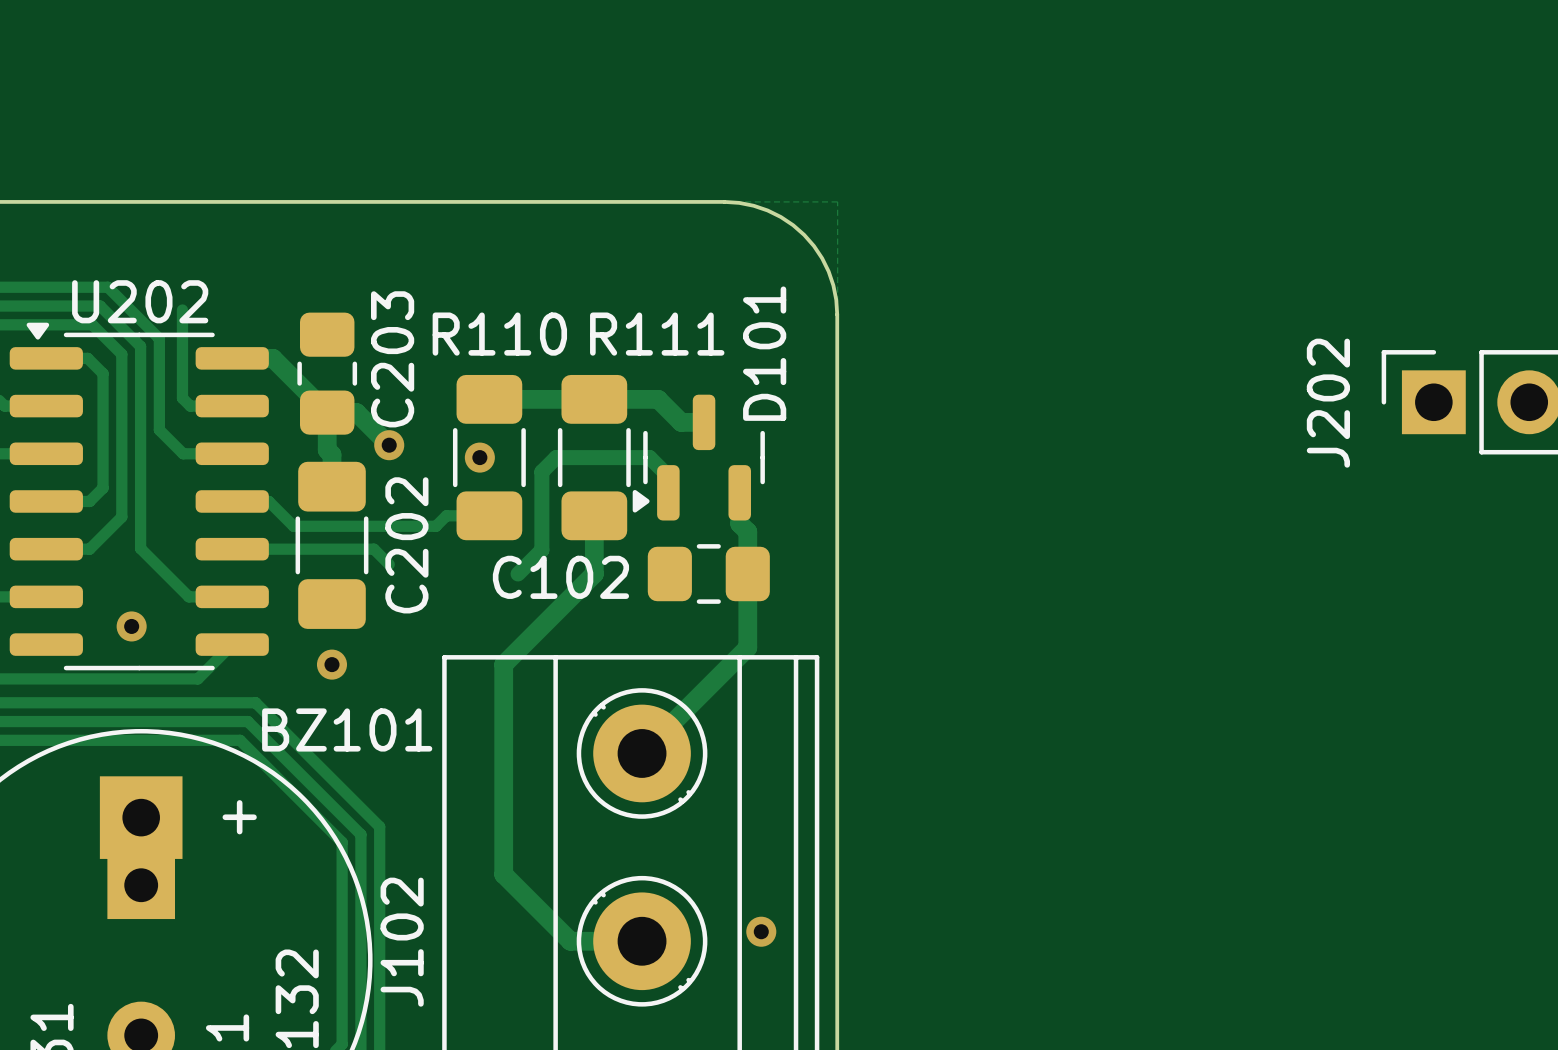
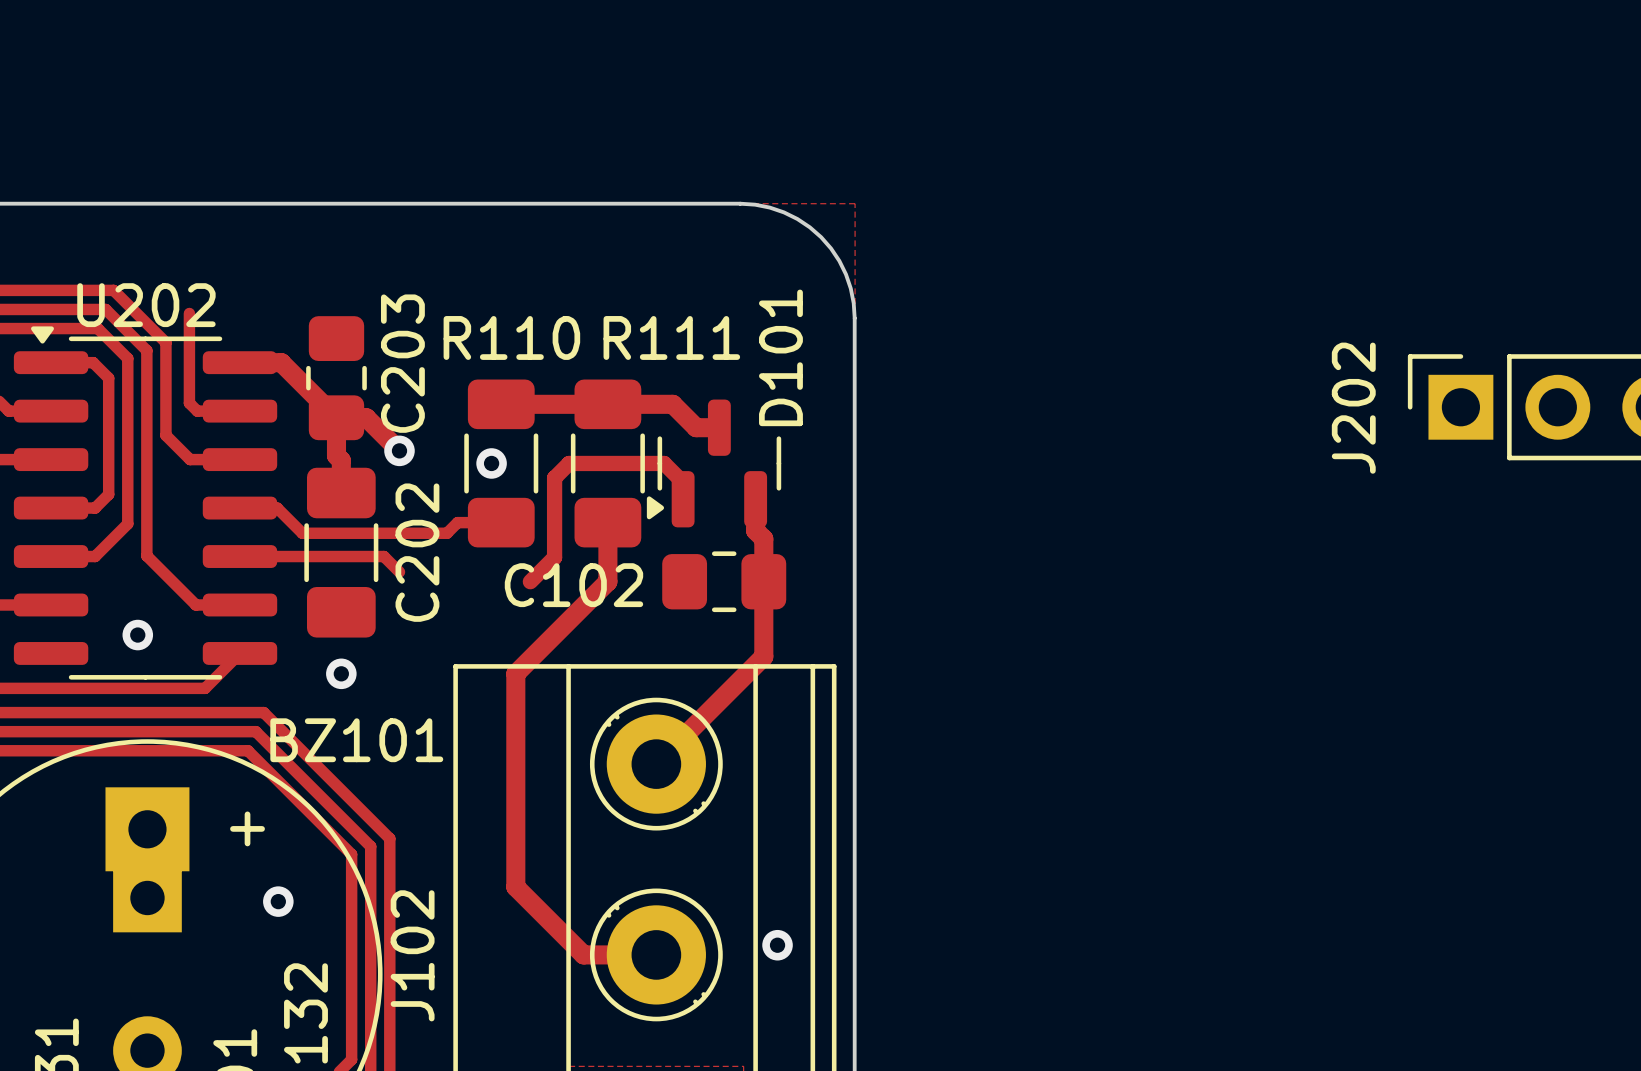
via: none -> (278, 901)

